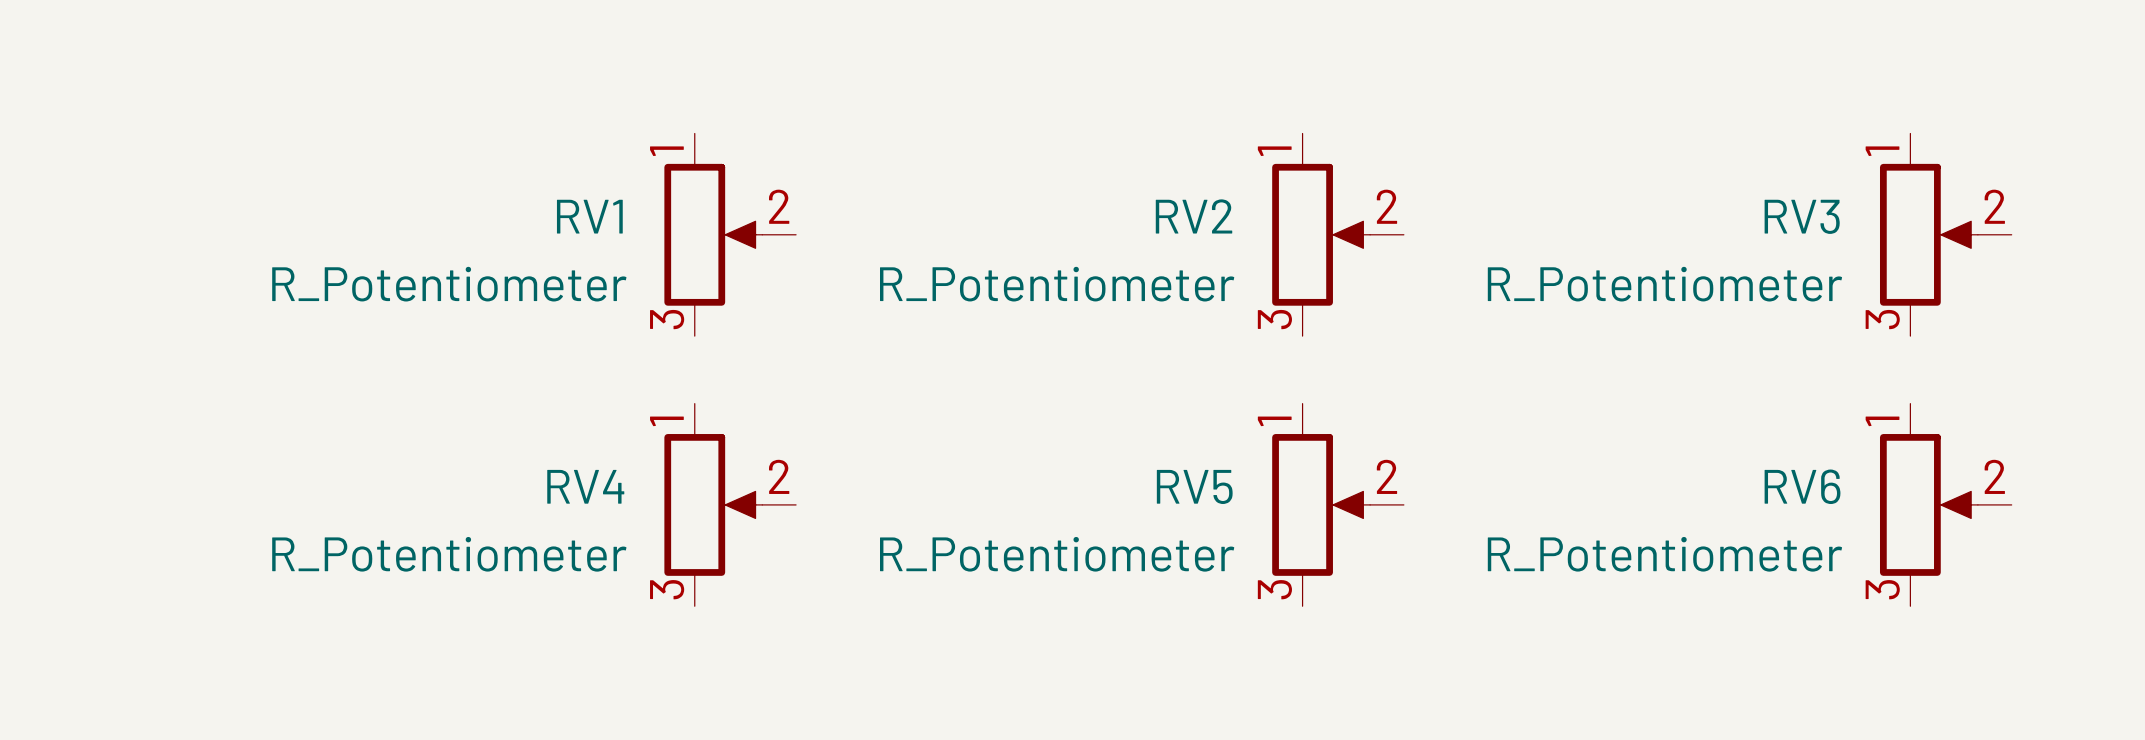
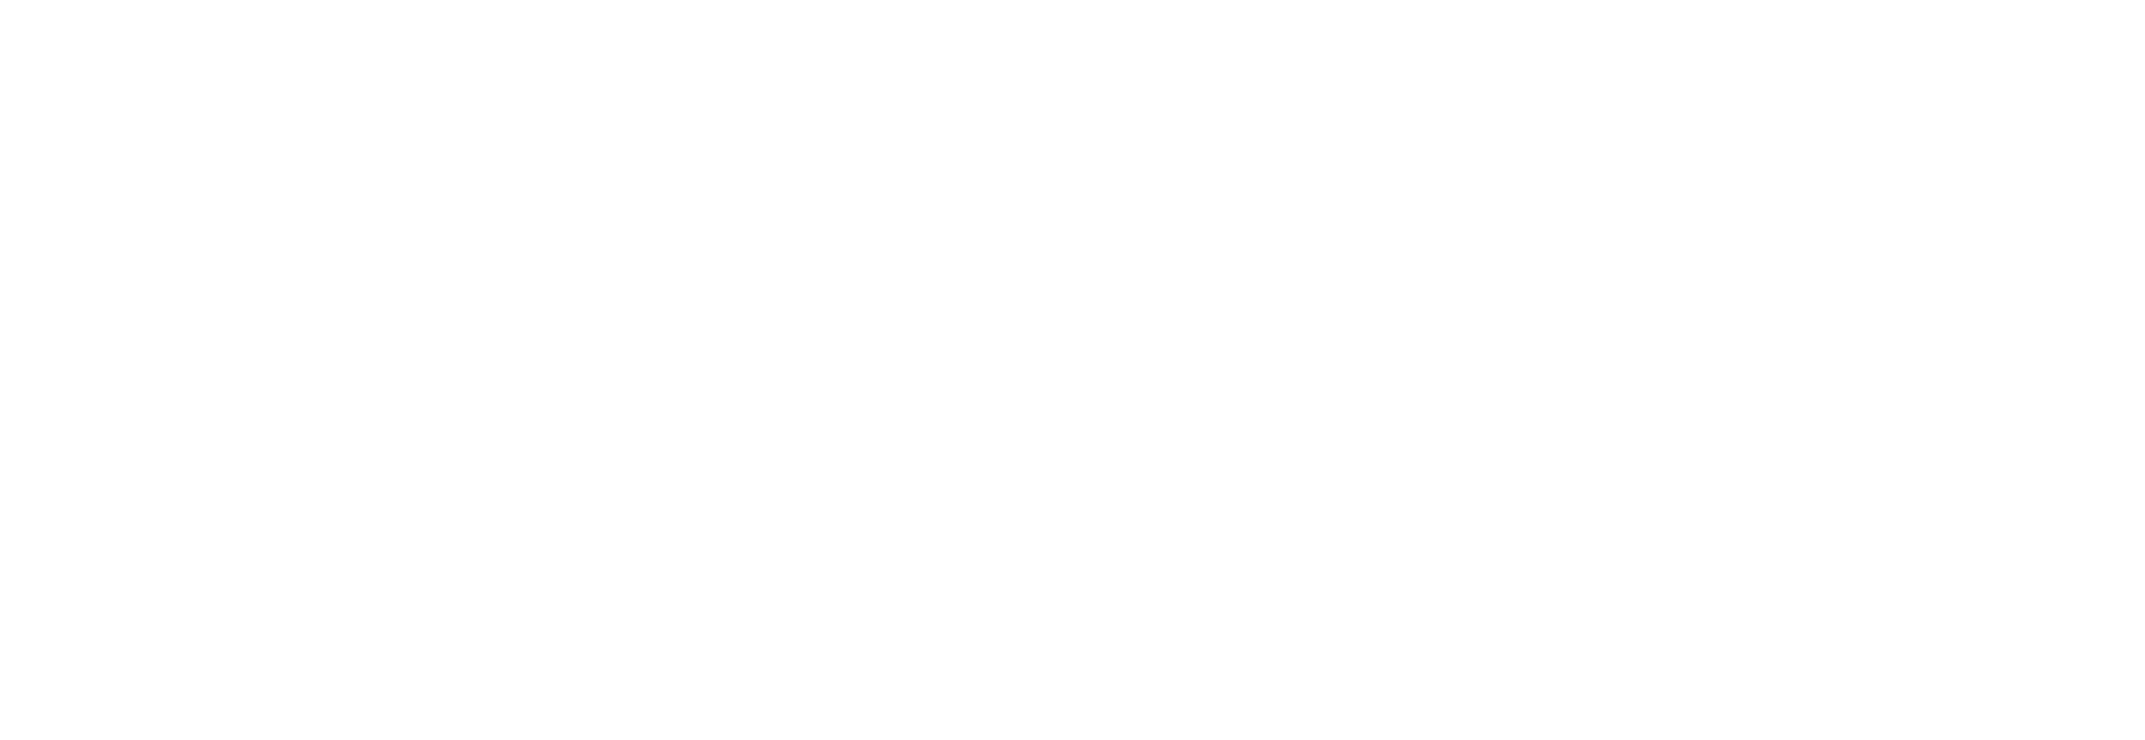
RV1: R_Potentiometer (730, 234) -> none
RV2: R_Potentiometer (1338, 234) -> none
RV3: R_Potentiometer (1945, 234) -> none
RV4: R_Potentiometer (730, 504) -> none
RV5: R_Potentiometer (1338, 504) -> none
RV6: R_Potentiometer (1945, 504) -> none

